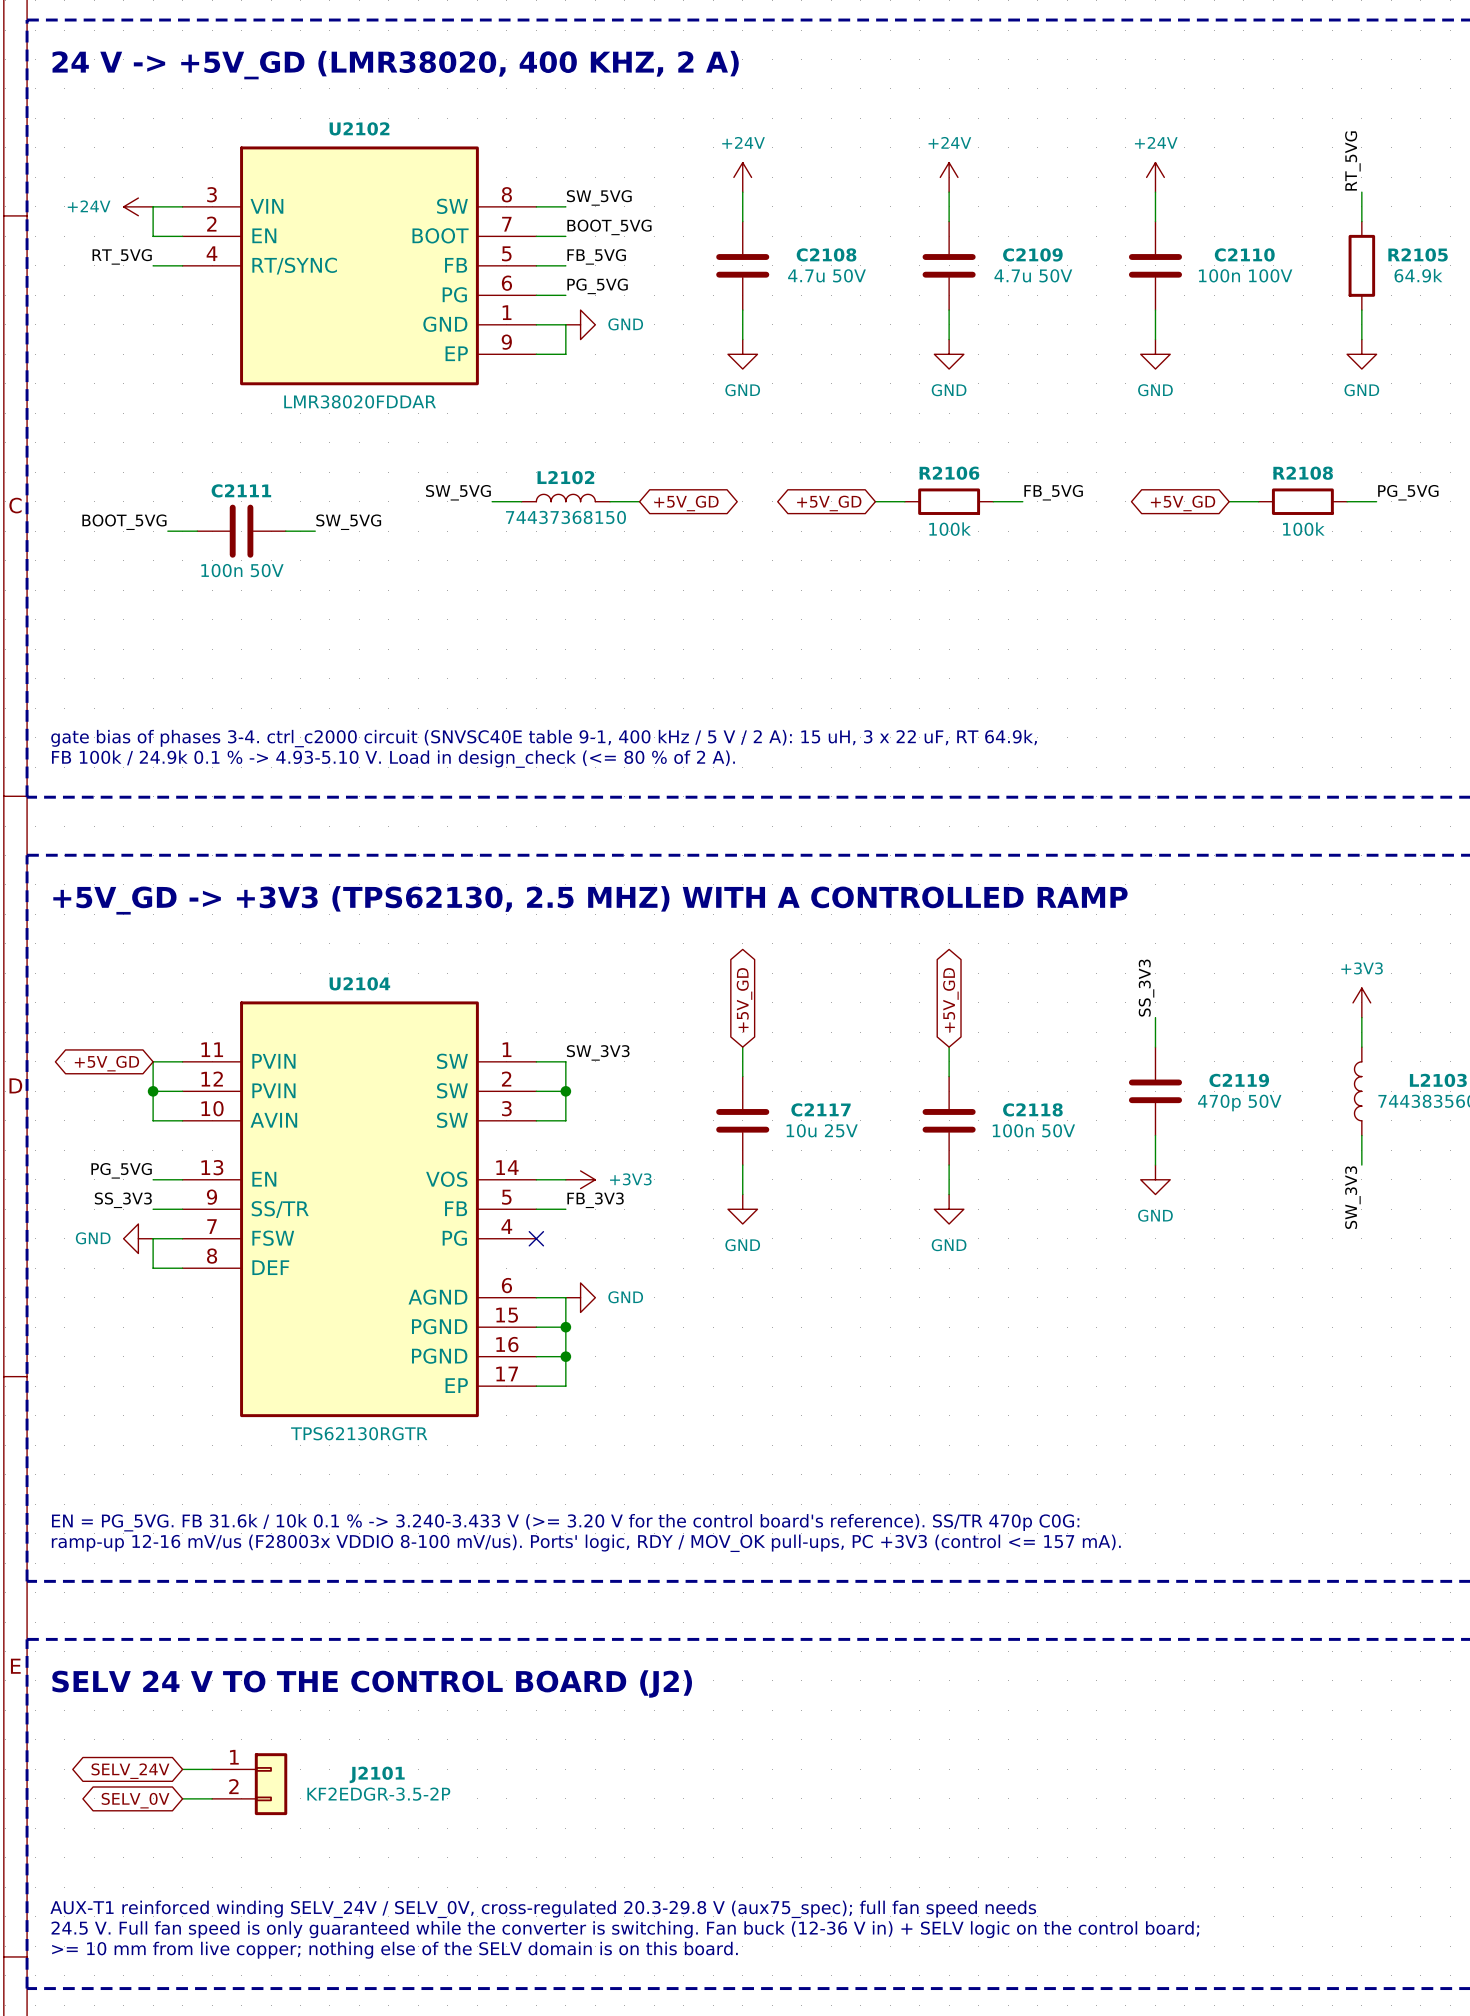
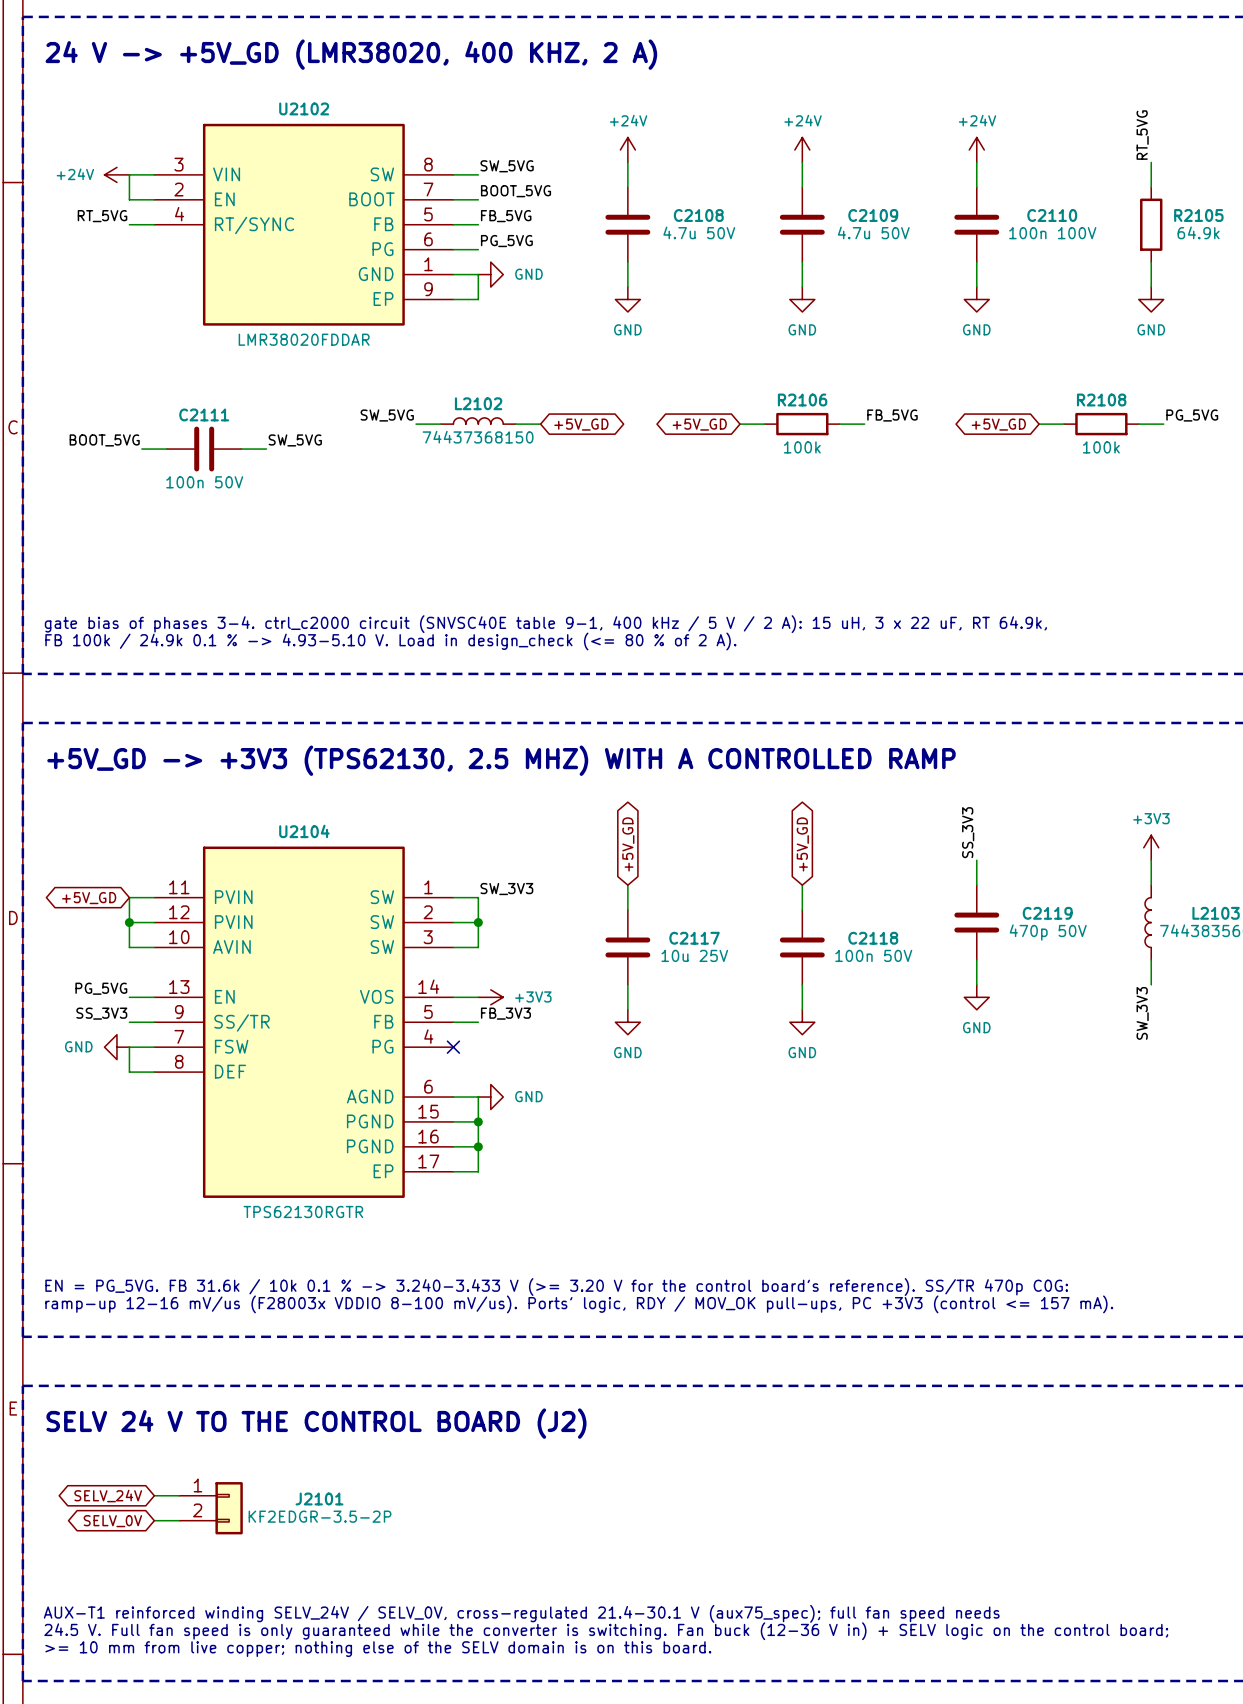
text: AUX-T1 reinforced winding SELV_24V / SELV_0V, cross-regulated 20.3-29.8 V (aux75_spec); full fan speed needs (543, 1909) -> AUX-T1 reinforced winding SELV_24V / SELV_0V, cross-regulated 21.4-30.1 V (aux75_spec); full fan speed needs (521, 1613)

